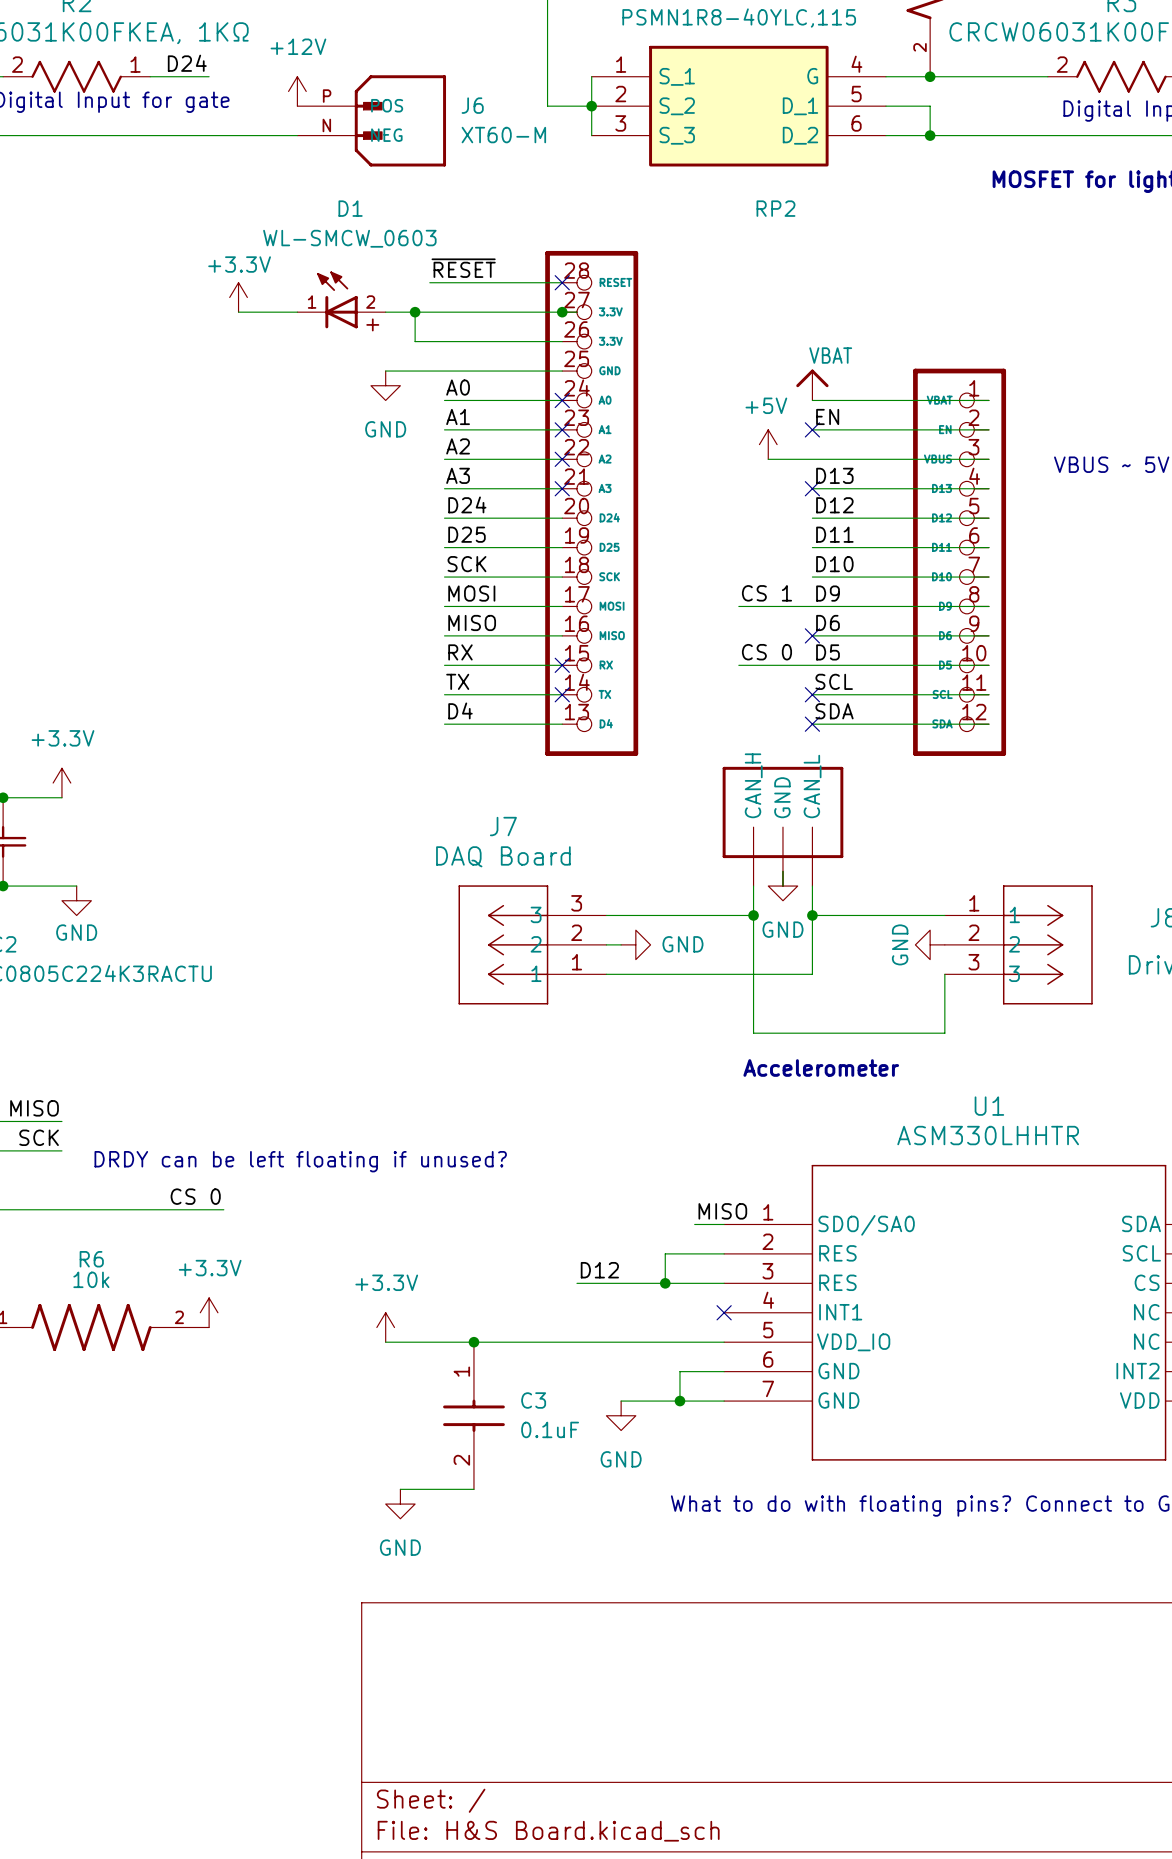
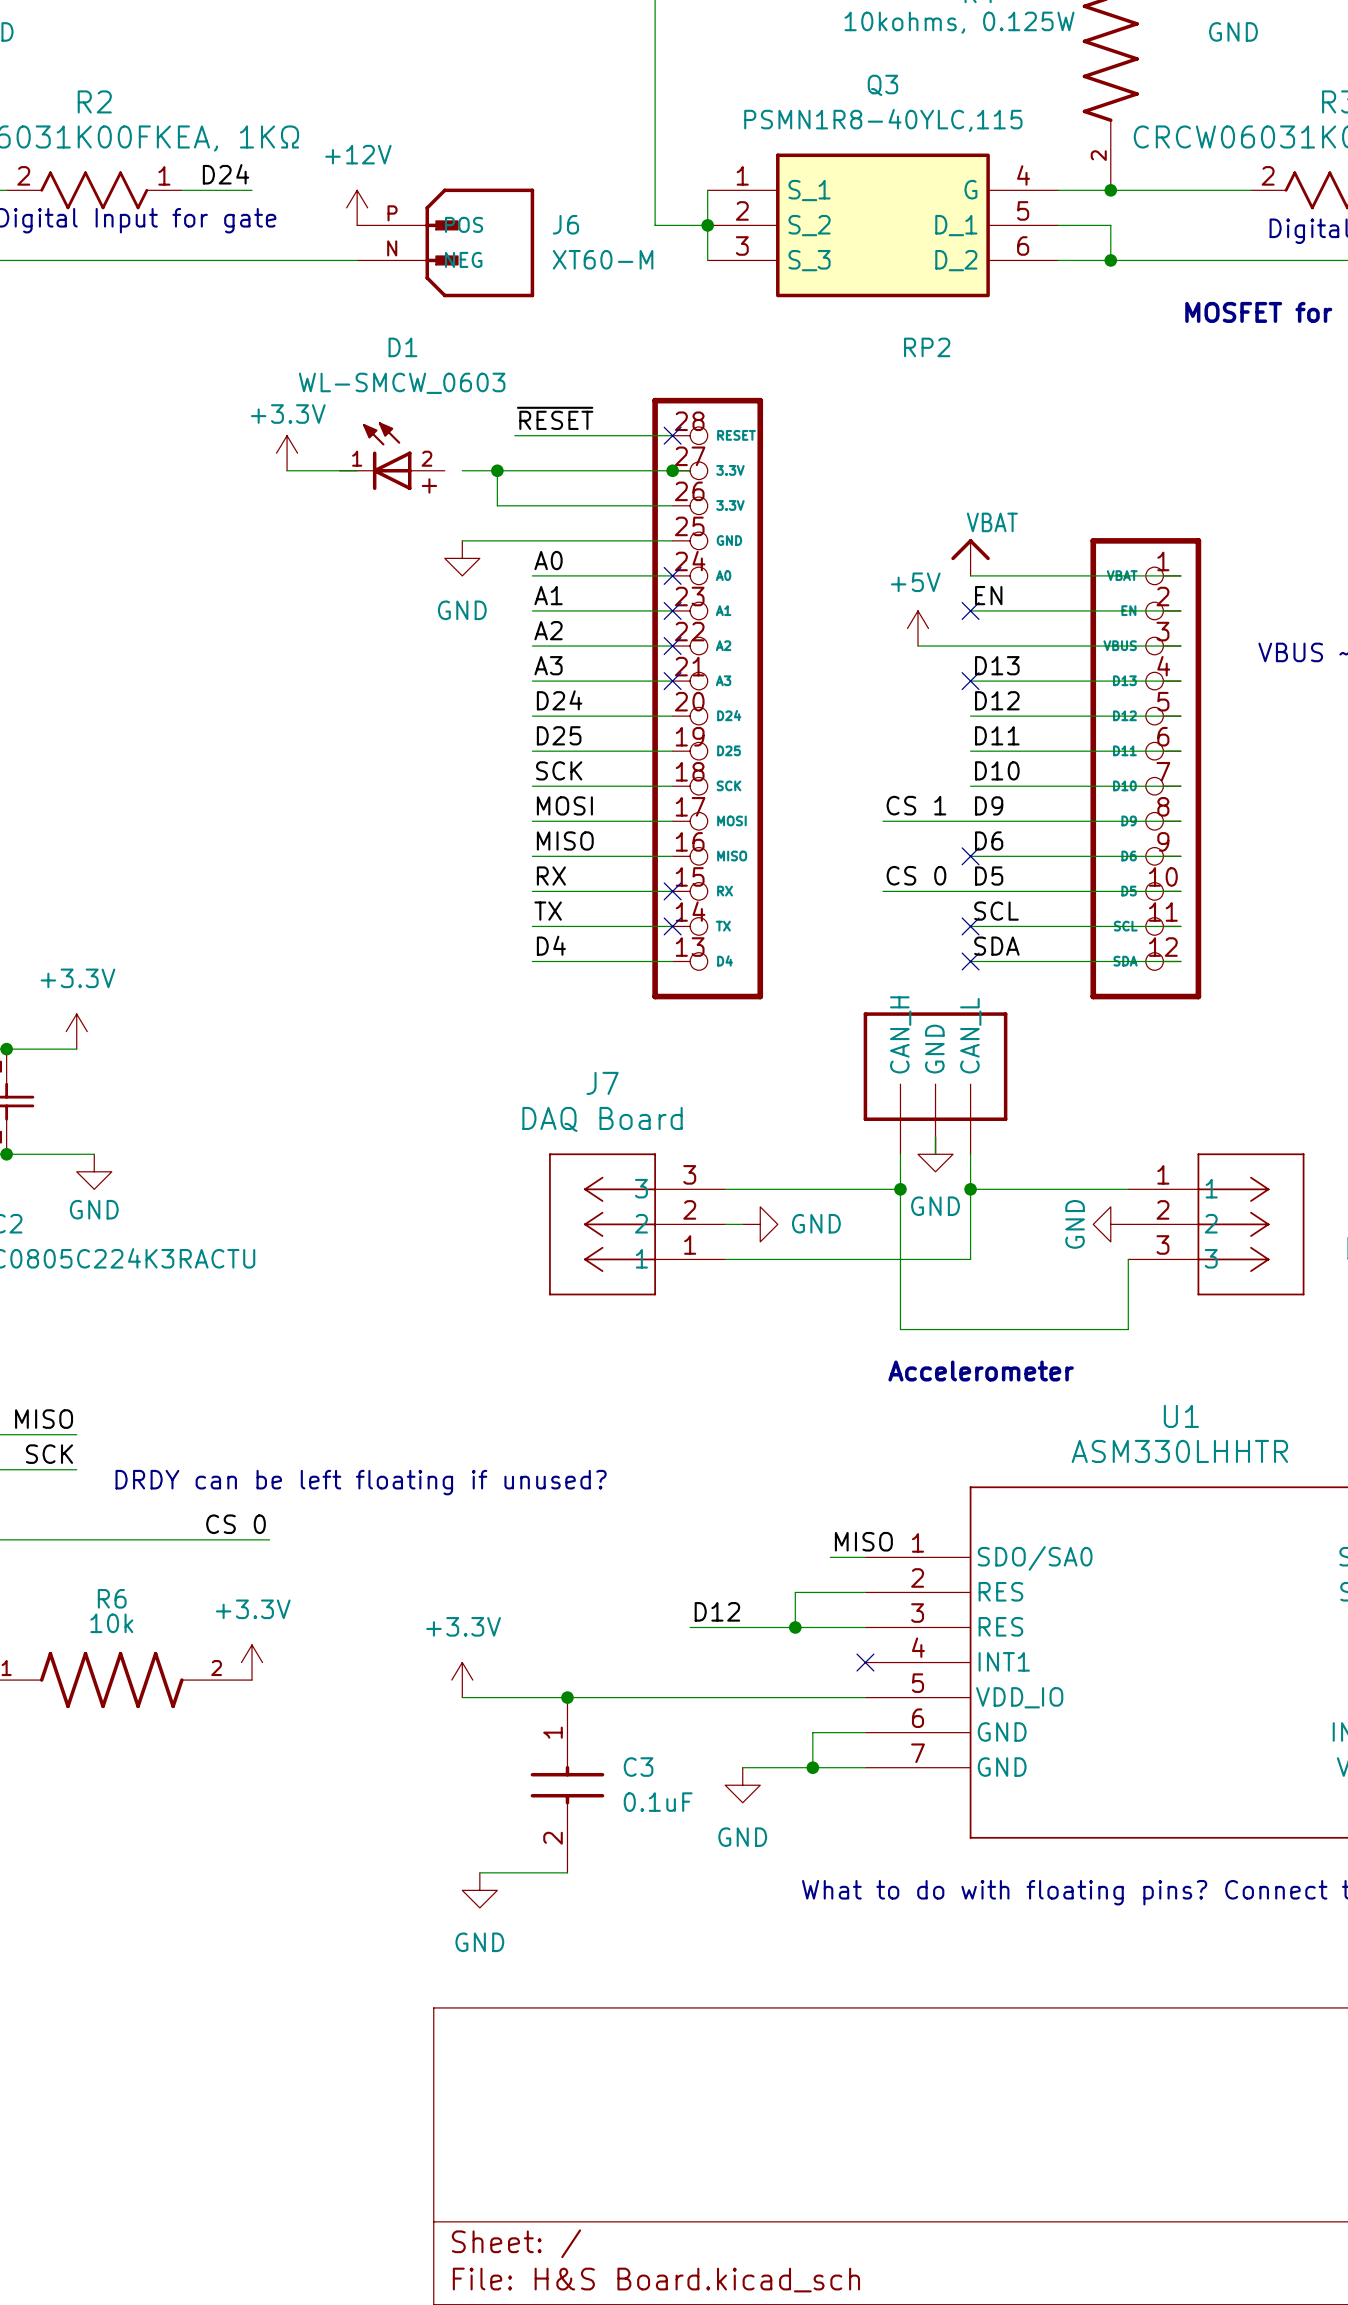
D1 position: (341, 299) -> (392, 456)

